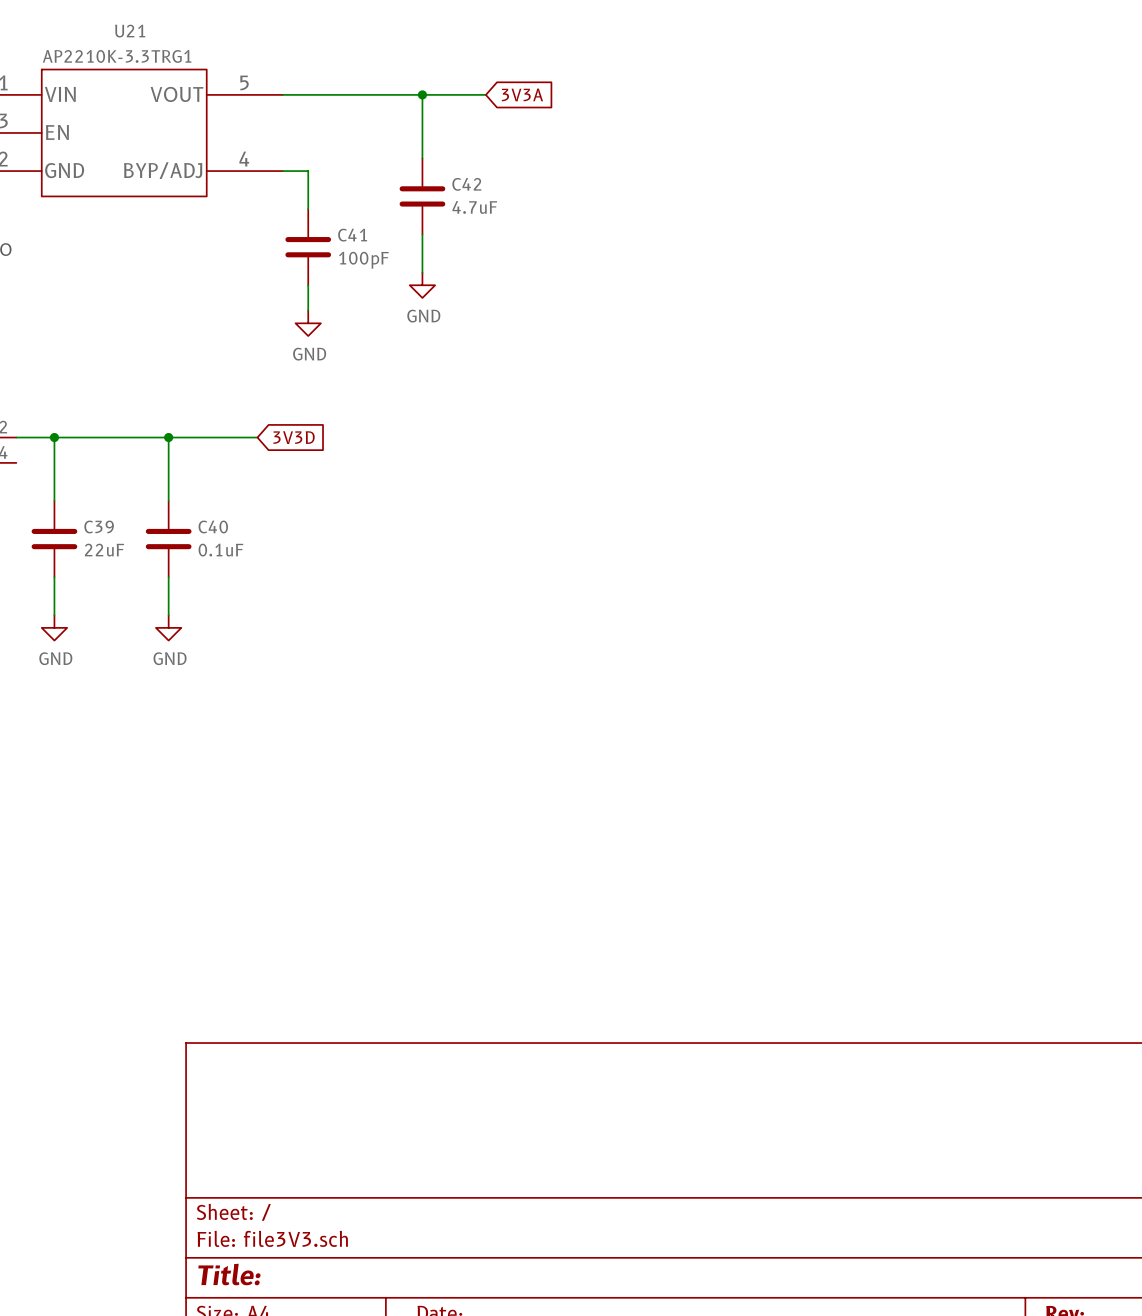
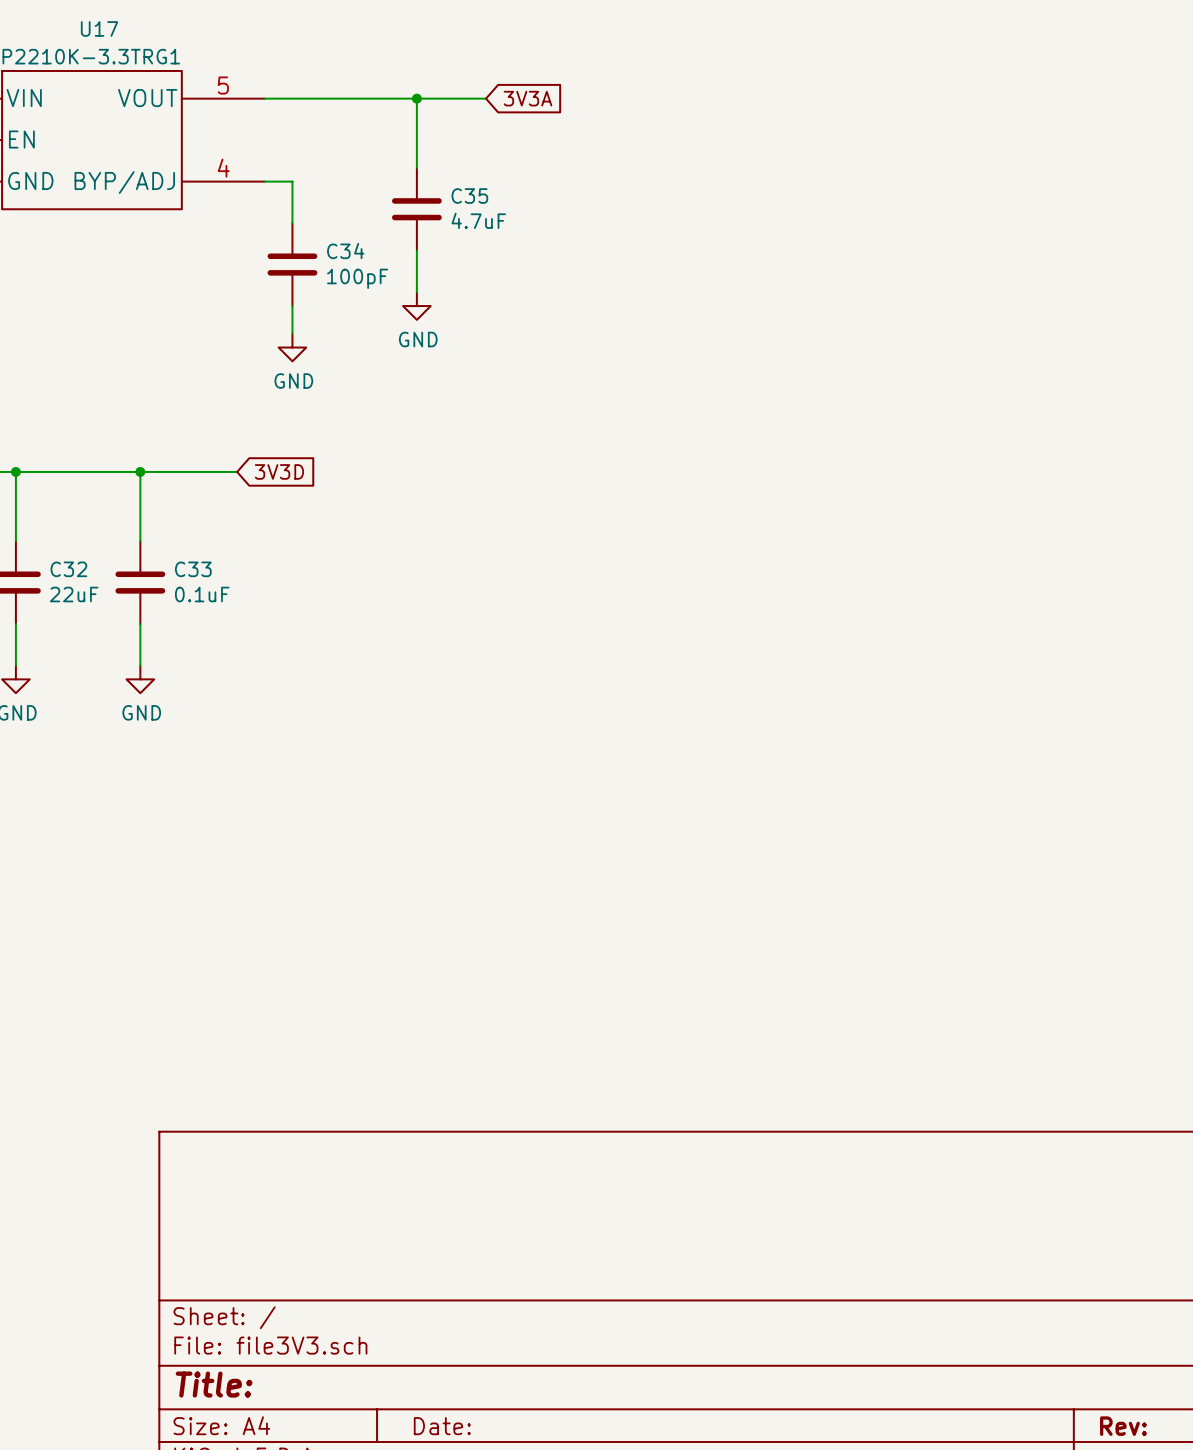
U21 name: U21 (130, 31) -> U17 (99, 28)
C42 name: C42 (466, 184) -> C35 (469, 196)
C41 name: C41 (352, 235) -> C34 (345, 250)
C39 name: C39 (99, 526) -> C32 (68, 569)
C40 name: C40 (213, 526) -> C33 (193, 569)

